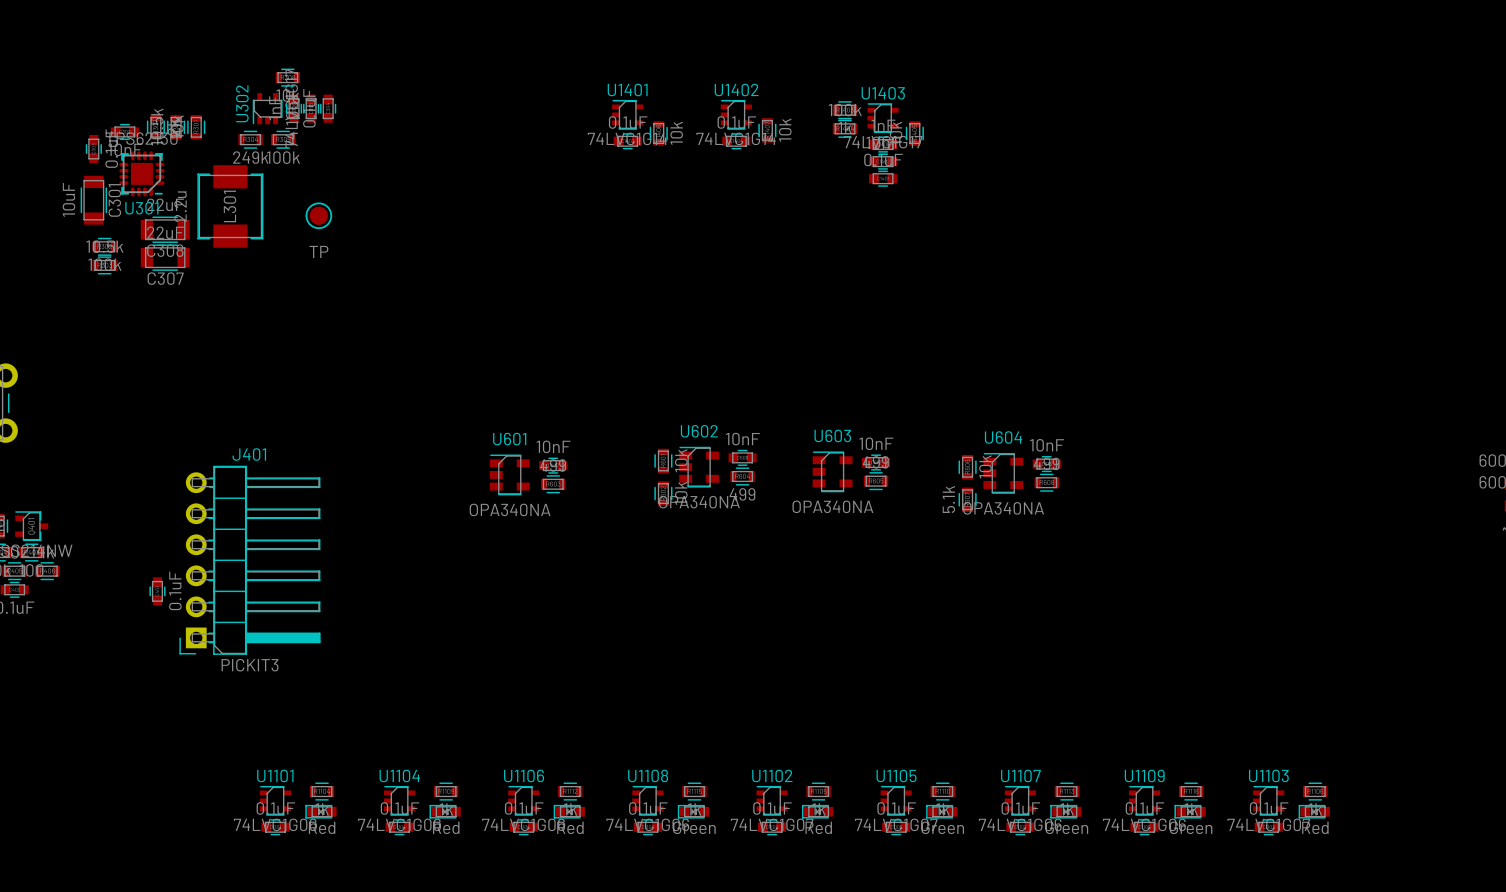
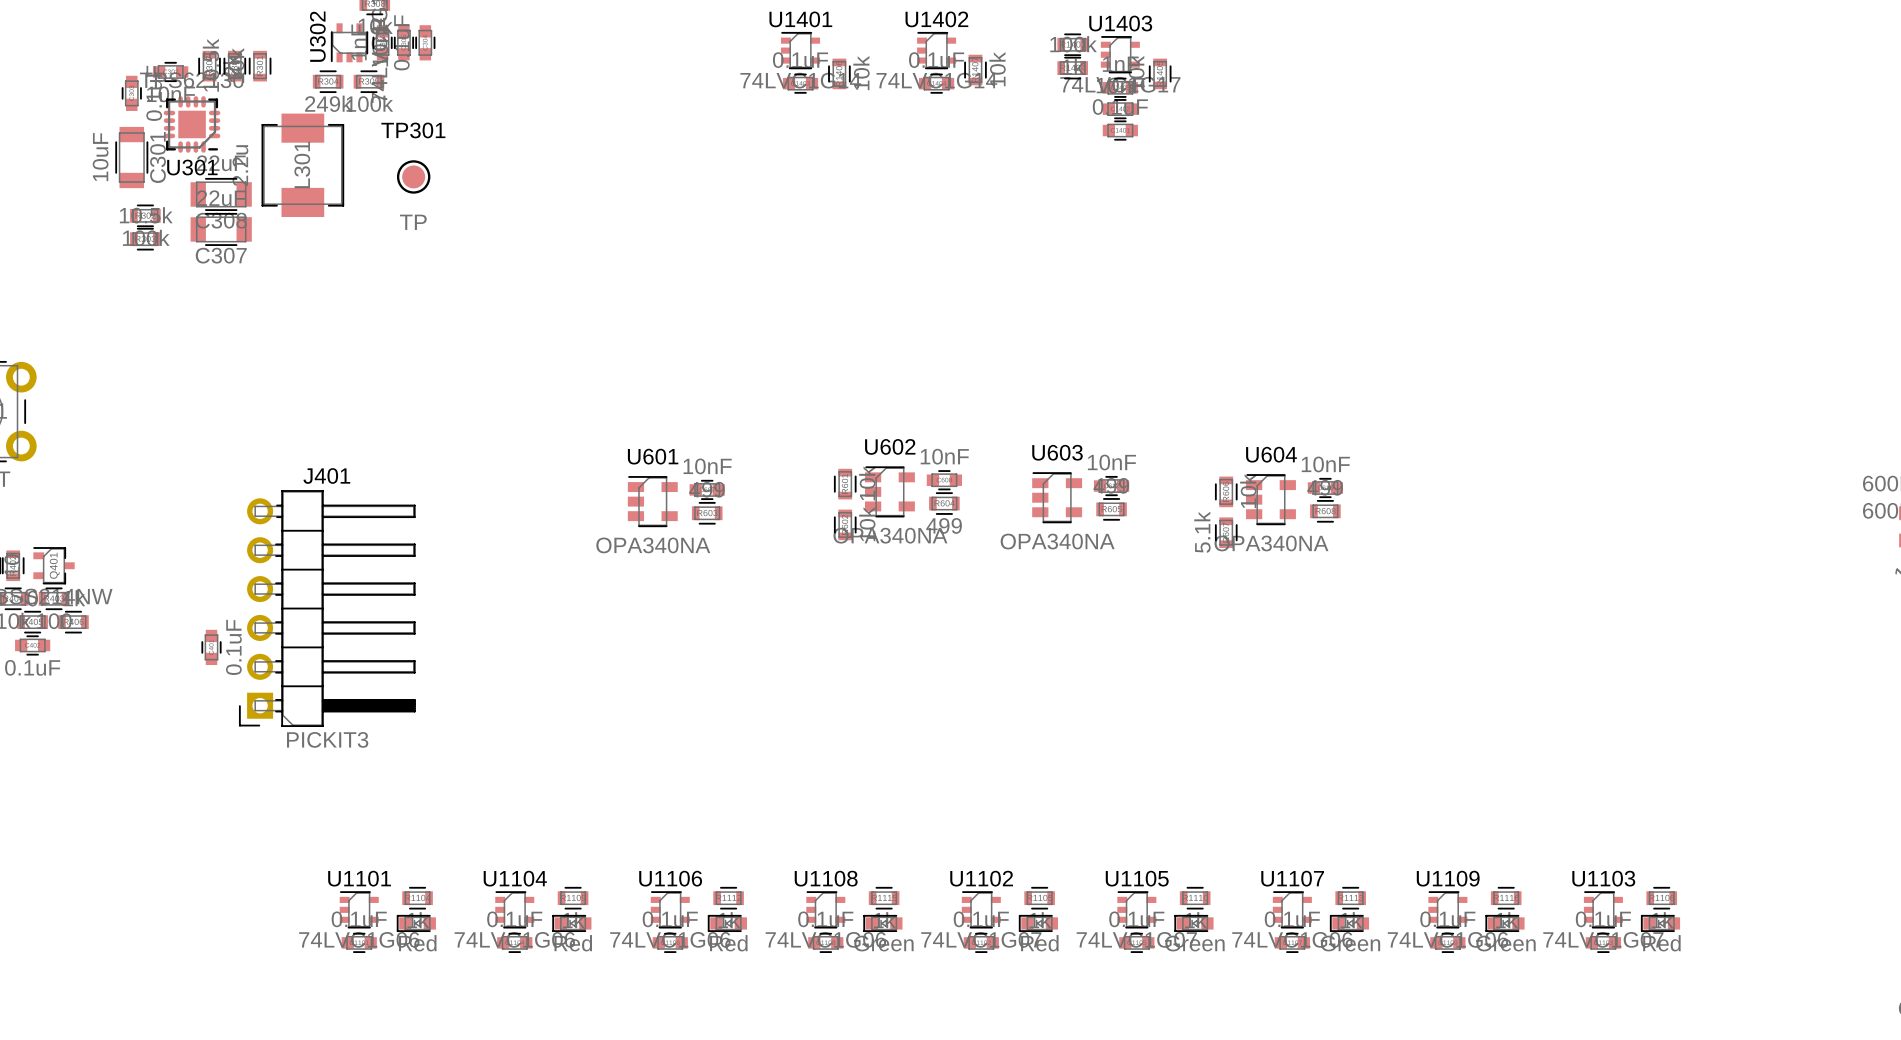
TP301 name: none -> TP301 (413, 130)

